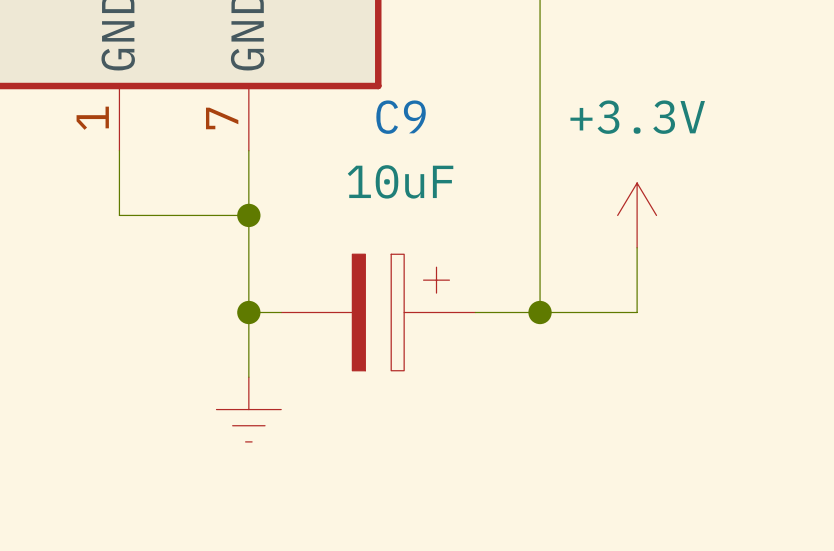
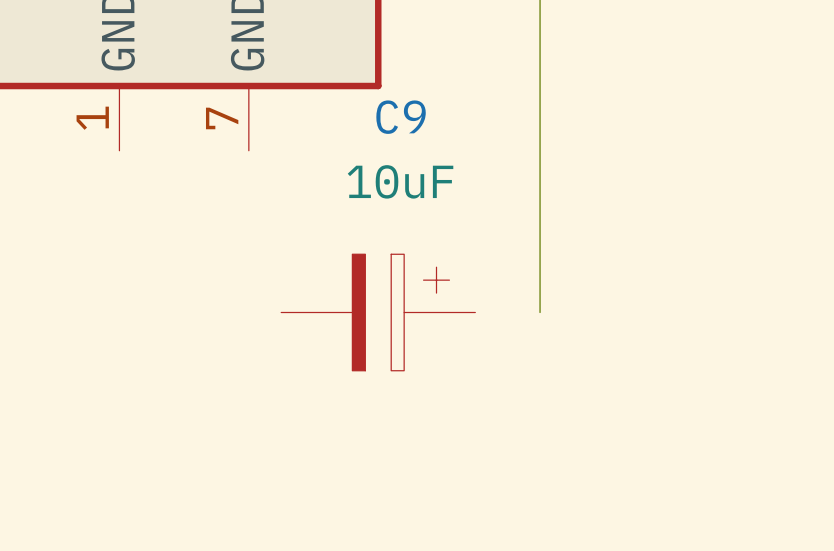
wire: (119, 150) (119, 215) (248, 215) -> none
wire: (248, 150) (248, 377) -> none
junction: (248, 215) -> none
power symbol: +3.3V (637, 215) -> none
wire: (637, 247) (637, 312) (475, 312) -> none
wire: (248, 312) (281, 312) -> none
junction: (248, 312) -> none
junction: (540, 312) -> none
power symbol: (248, 409) -> none

